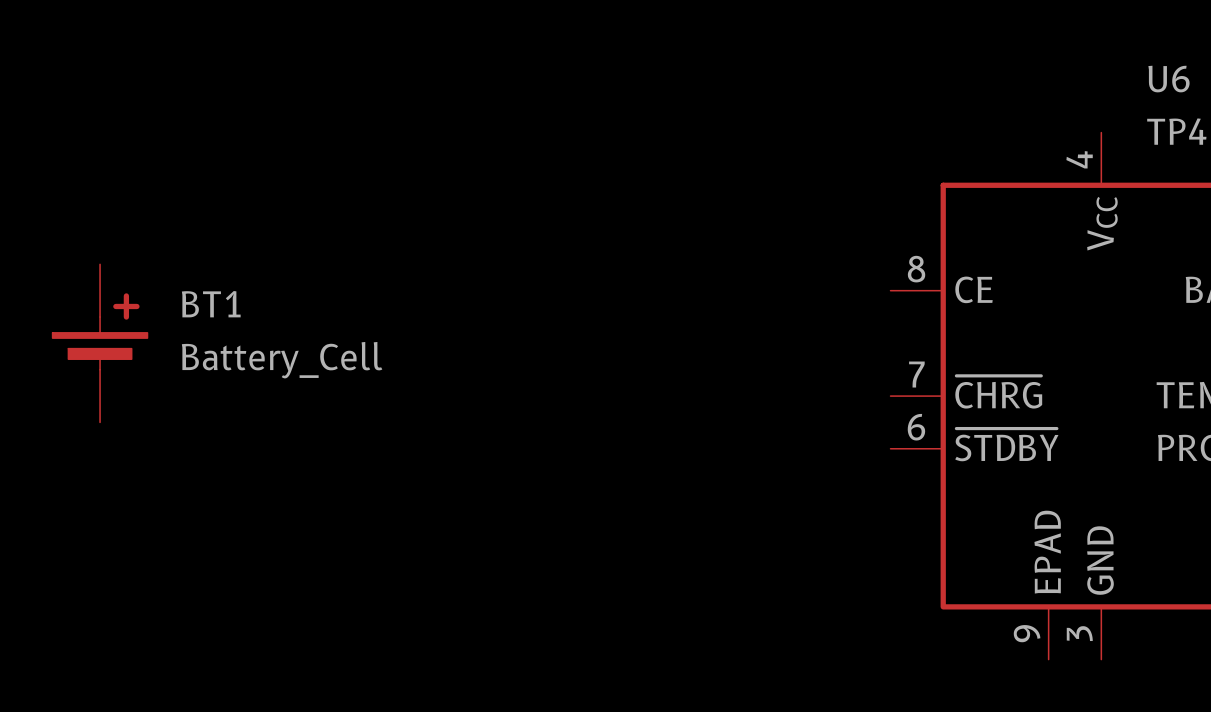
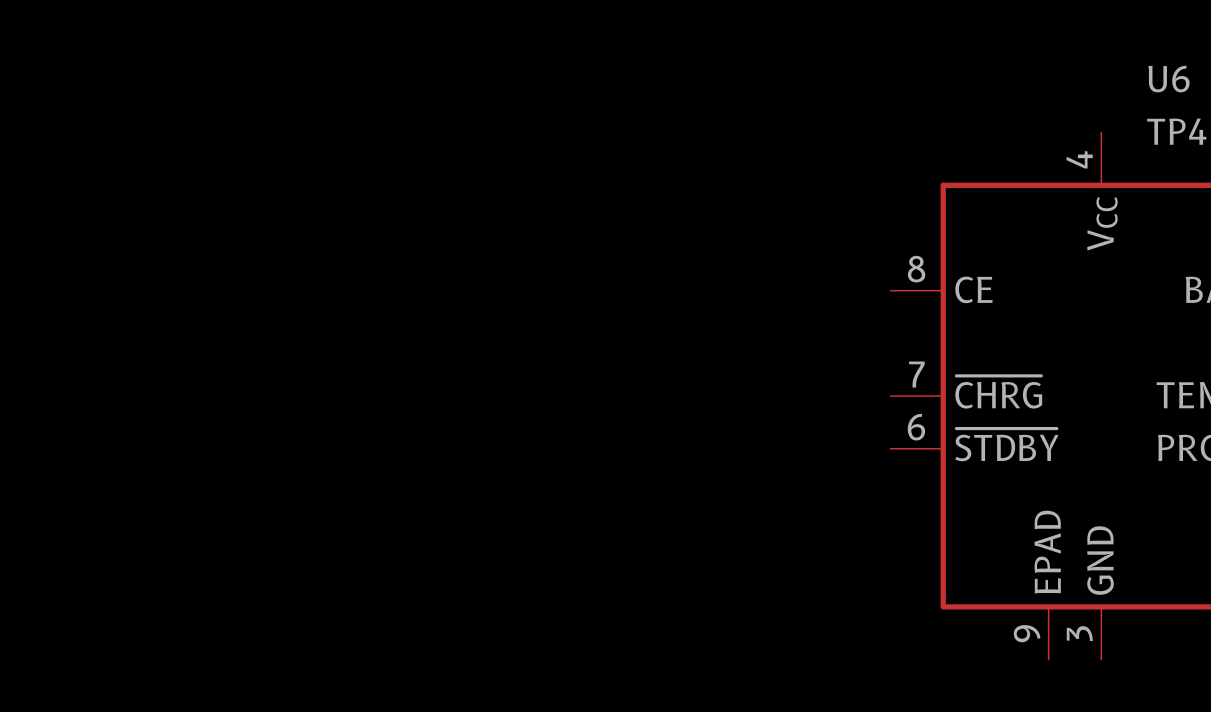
BT1: Battery_Cell (100, 343) -> none

